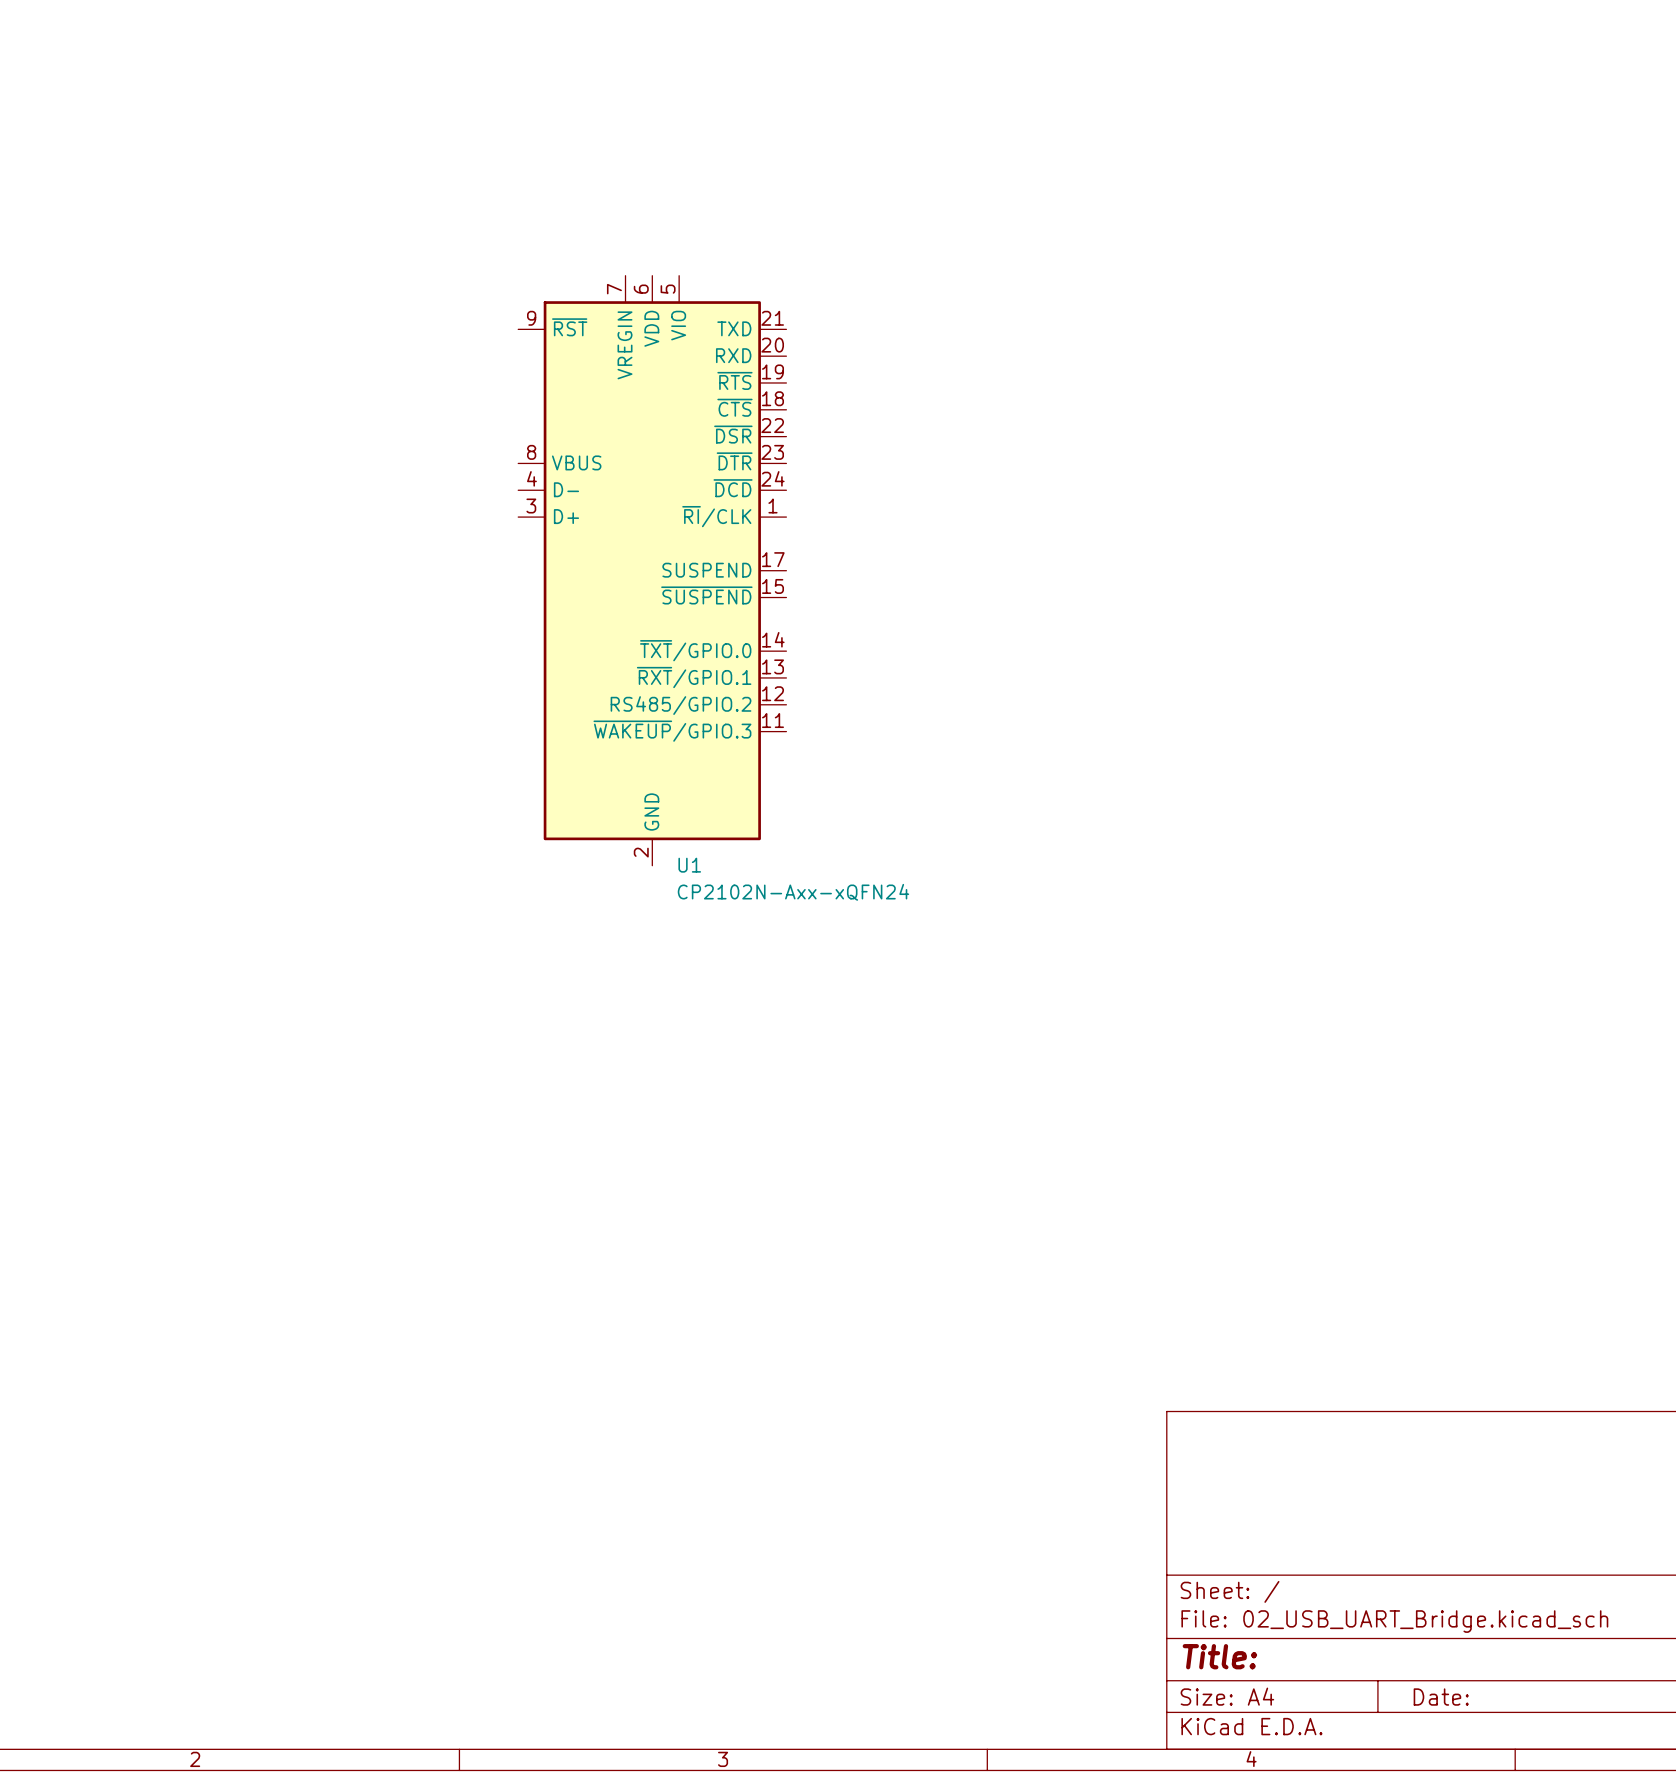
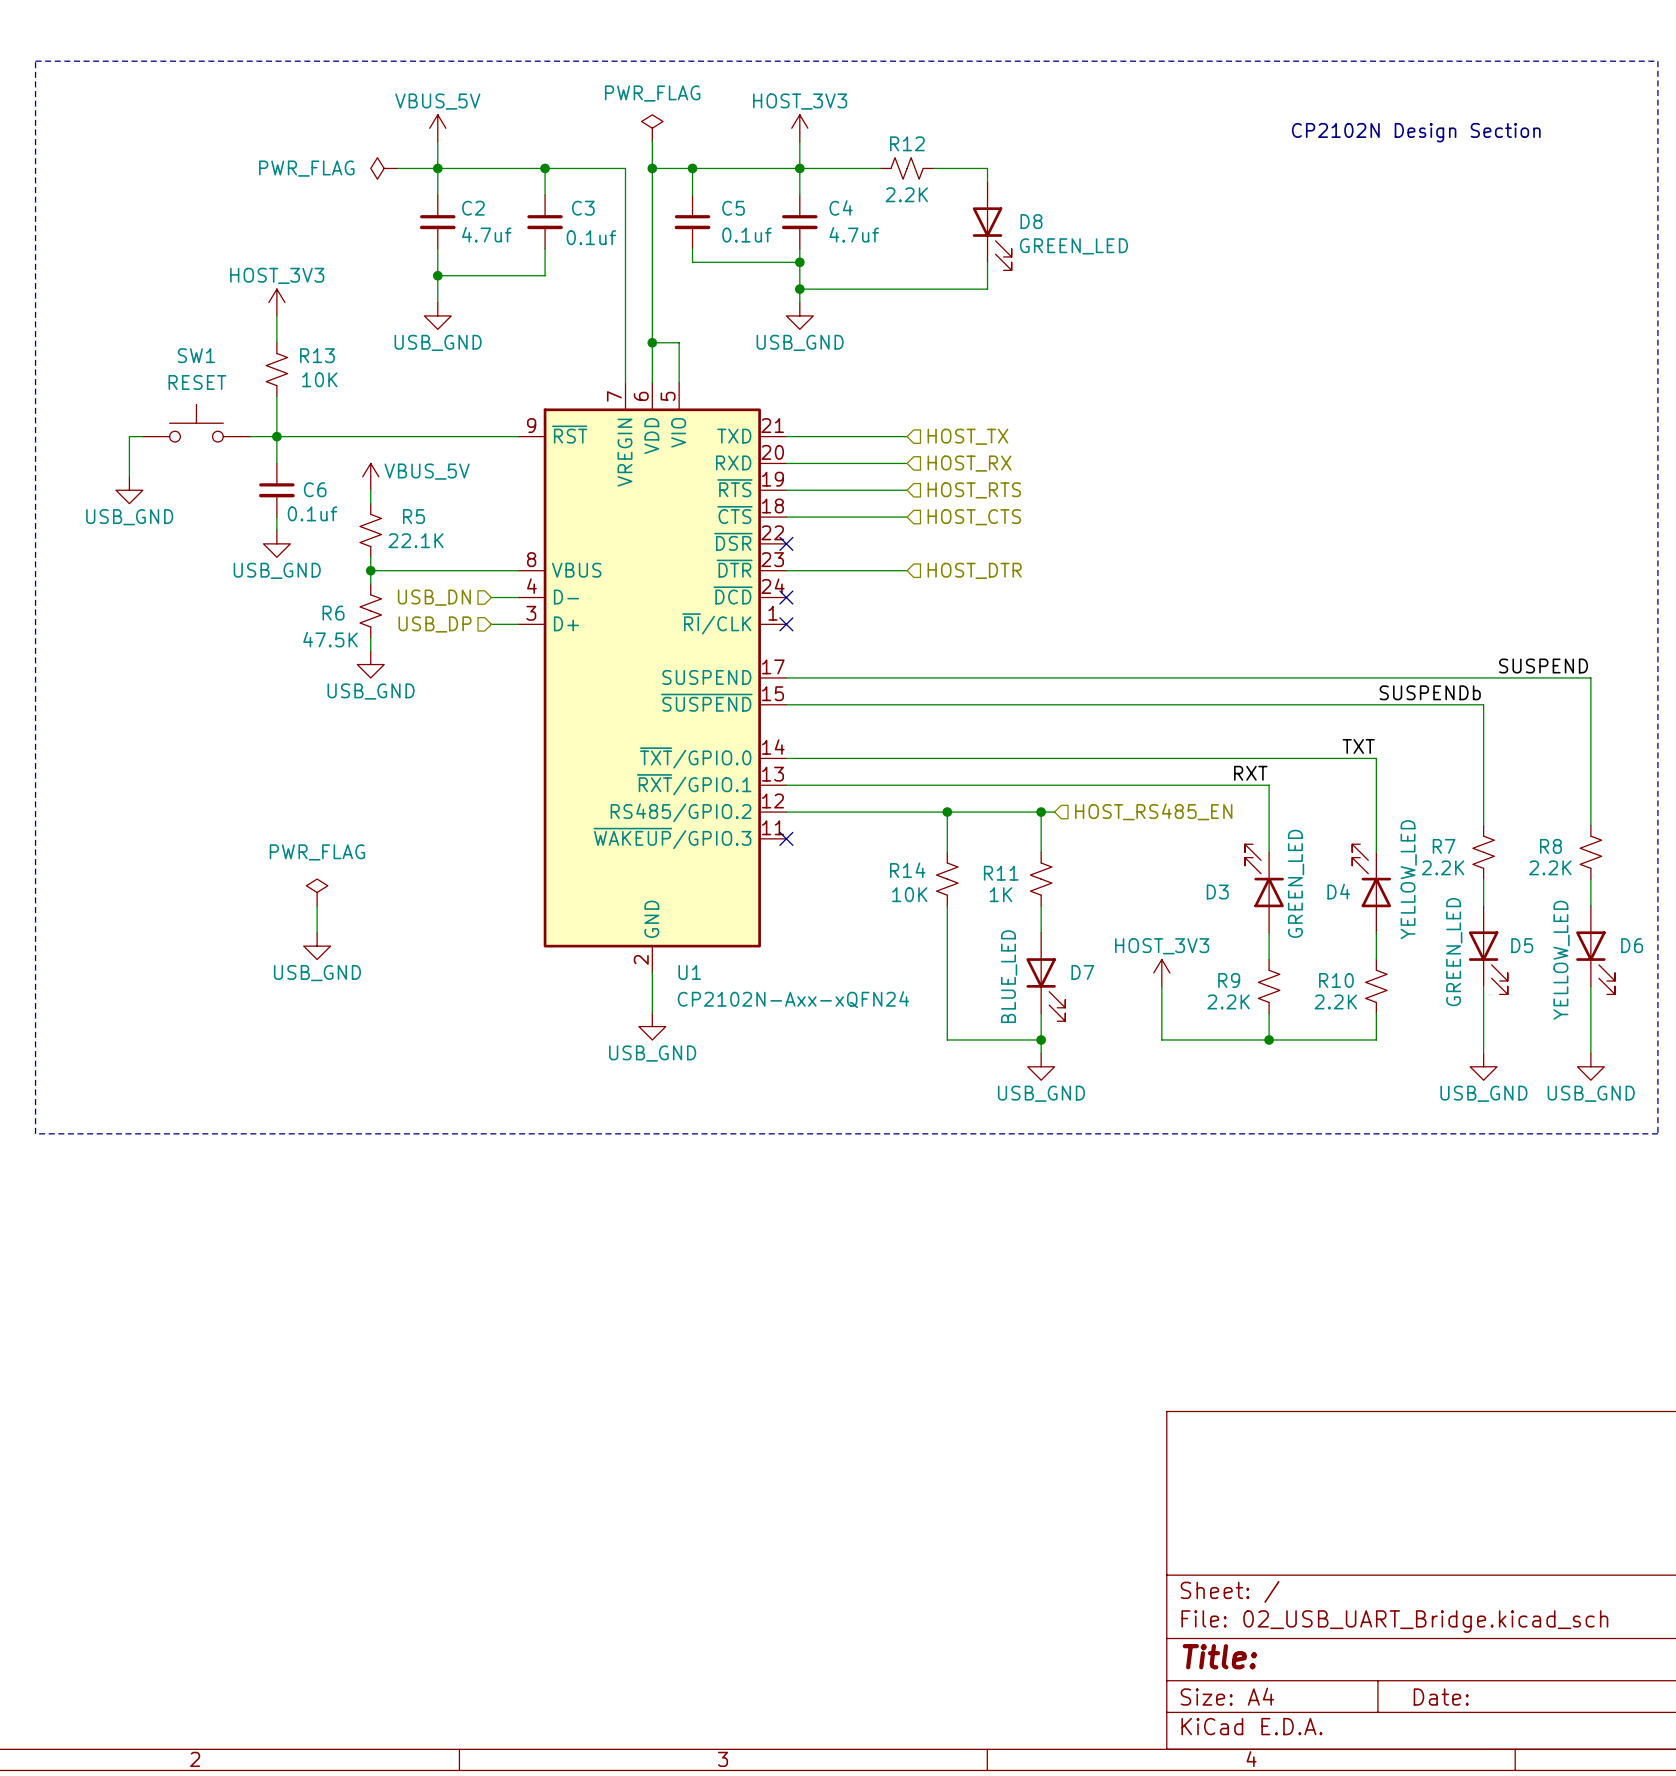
line: none -> (35, 61) (1657, 61) (1657, 1133) (35, 1133) (35, 61)
power symbol: none -> VBUS_5V (437, 128)
power symbol: none -> PWR_FLAG (652, 128)
power symbol: none -> HOST_3V3 (799, 128)
text: none -> CP2102N Design Section (1416, 132)
wire: none -> (437, 141) (437, 195)
wire: none -> (652, 141) (652, 382)
wire: none -> (799, 141) (799, 195)
power symbol: none -> PWR_FLAG (384, 168)
wire: none -> (397, 168) (625, 168) (625, 382)
junction: none -> (437, 168)
wire: none -> (545, 168) (545, 195)
junction: none -> (545, 168)
wire: none -> (652, 168) (880, 168)
junction: none -> (652, 168)
wire: none -> (692, 168) (692, 195)
junction: none -> (692, 168)
junction: none -> (799, 168)
R12: none -> 2.2K (907, 168)
wire: none -> (933, 168) (987, 168) (987, 181)
C2: none -> 4.7uf (437, 222)
C3: none -> 0.1uf (545, 222)
C5: none -> 0.1uf (692, 222)
C4: none -> 4.7uf (799, 222)
D8: none -> GREEN_LED (992, 226)
wire: none -> (437, 248) (437, 302)
wire: none -> (545, 248) (545, 275) (437, 275)
wire: none -> (692, 248) (692, 262) (799, 262)
wire: none -> (799, 248) (799, 302)
junction: none -> (799, 262)
wire: none -> (987, 262) (987, 289) (799, 289)
junction: none -> (437, 275)
junction: none -> (799, 289)
power symbol: none -> HOST_3V3 (276, 302)
wire: none -> (276, 315) (276, 342)
power symbol: none -> USB_GND (437, 315)
power symbol: none -> USB_GND (799, 315)
junction: none -> (652, 342)
R13: none -> 10K (276, 369)
wire: none -> (276, 396) (276, 463)
SW1: none -> RESET (196, 423)
wire: none -> (142, 436) (129, 436) (129, 476)
wire: none -> (250, 436) (518, 436)
junction: none -> (276, 436)
wire: none -> (786, 436) (907, 436)
hierarchical label: none -> HOST_TX (967, 436)
wire: none -> (786, 463) (907, 463)
hierarchical label: none -> HOST_RX (969, 463)
power symbol: none -> VBUS_5V (370, 476)
power symbol: none -> USB_GND (129, 490)
C6: none -> 0.1uf (276, 490)
wire: none -> (370, 490) (370, 503)
wire: none -> (786, 490) (907, 490)
hierarchical label: none -> HOST_RTS (974, 490)
wire: none -> (276, 517) (276, 530)
wire: none -> (786, 517) (907, 517)
hierarchical label: none -> HOST_CTS (974, 517)
R5: none -> 22.1K (370, 530)
power symbol: none -> USB_GND (276, 543)
no-connect mark: none -> (786, 543)
wire: none -> (370, 557) (370, 584)
wire: none -> (370, 570) (518, 570)
junction: none -> (370, 570)
U1 position: (652, 570) -> (652, 677)
wire: none -> (786, 570) (907, 570)
hierarchical label: none -> HOST_DTR (974, 570)
hierarchical label: none -> USB_DN (434, 597)
wire: none -> (491, 597) (518, 597)
no-connect mark: none -> (786, 597)
R6: none -> 47.5K (370, 610)
hierarchical label: none -> USB_DP (435, 624)
wire: none -> (491, 624) (518, 624)
no-connect mark: none -> (786, 624)
wire: none -> (370, 637) (370, 651)
power symbol: none -> USB_GND (370, 664)
label: none -> SUSPEND (1543, 666)
wire: none -> (786, 677) (1590, 677) (1590, 825)
label: none -> SUSPENDb (1430, 692)
wire: none -> (786, 704) (1483, 704) (1483, 825)
label: none -> TXT (1358, 746)
wire: none -> (786, 758) (1376, 758) (1376, 852)
label: none -> RXT (1250, 773)
wire: none -> (786, 785) (1269, 785) (1269, 852)
hierarchical label: none -> HOST_RS485_EN (1153, 811)
wire: none -> (786, 812) (1054, 812)
wire: none -> (947, 812) (947, 852)
junction: none -> (947, 812)
wire: none -> (1041, 812) (1041, 852)
junction: none -> (1041, 812)
no-connect mark: none -> (786, 838)
R7: none -> 2.2K (1483, 852)
R8: none -> 2.2K (1590, 852)
R14: none -> 10K (947, 879)
R11: none -> 1K (1041, 879)
wire: none -> (1483, 879) (1483, 905)
wire: none -> (1590, 879) (1590, 905)
D3: none -> GREEN_LED (1264, 888)
D4: none -> YELLOW_LED (1371, 888)
power symbol: none -> PWR_FLAG (317, 892)
wire: none -> (317, 905) (317, 932)
wire: none -> (947, 905) (947, 1039) (1041, 1039)
wire: none -> (1041, 905) (1041, 932)
wire: none -> (1269, 932) (1269, 959)
wire: none -> (1376, 932) (1376, 959)
power symbol: none -> USB_GND (317, 946)
D5: none -> GREEN_LED (1488, 950)
D6: none -> YELLOW_LED (1595, 950)
wire: none -> (652, 972) (652, 1013)
power symbol: none -> HOST_3V3 (1161, 972)
D7: none -> BLUE_LED (1045, 976)
wire: none -> (1161, 986) (1161, 1039) (1376, 1039) (1376, 1013)
R9: none -> 2.2K (1269, 986)
R10: none -> 2.2K (1376, 986)
wire: none -> (1483, 986) (1483, 1053)
wire: none -> (1590, 986) (1590, 1053)
wire: none -> (1041, 1013) (1041, 1053)
wire: none -> (1269, 1013) (1269, 1039)
power symbol: none -> USB_GND (652, 1026)
junction: none -> (1041, 1039)
junction: none -> (1269, 1039)
power symbol: none -> USB_GND (1041, 1066)
power symbol: none -> USB_GND (1483, 1066)
power symbol: none -> USB_GND (1590, 1066)

